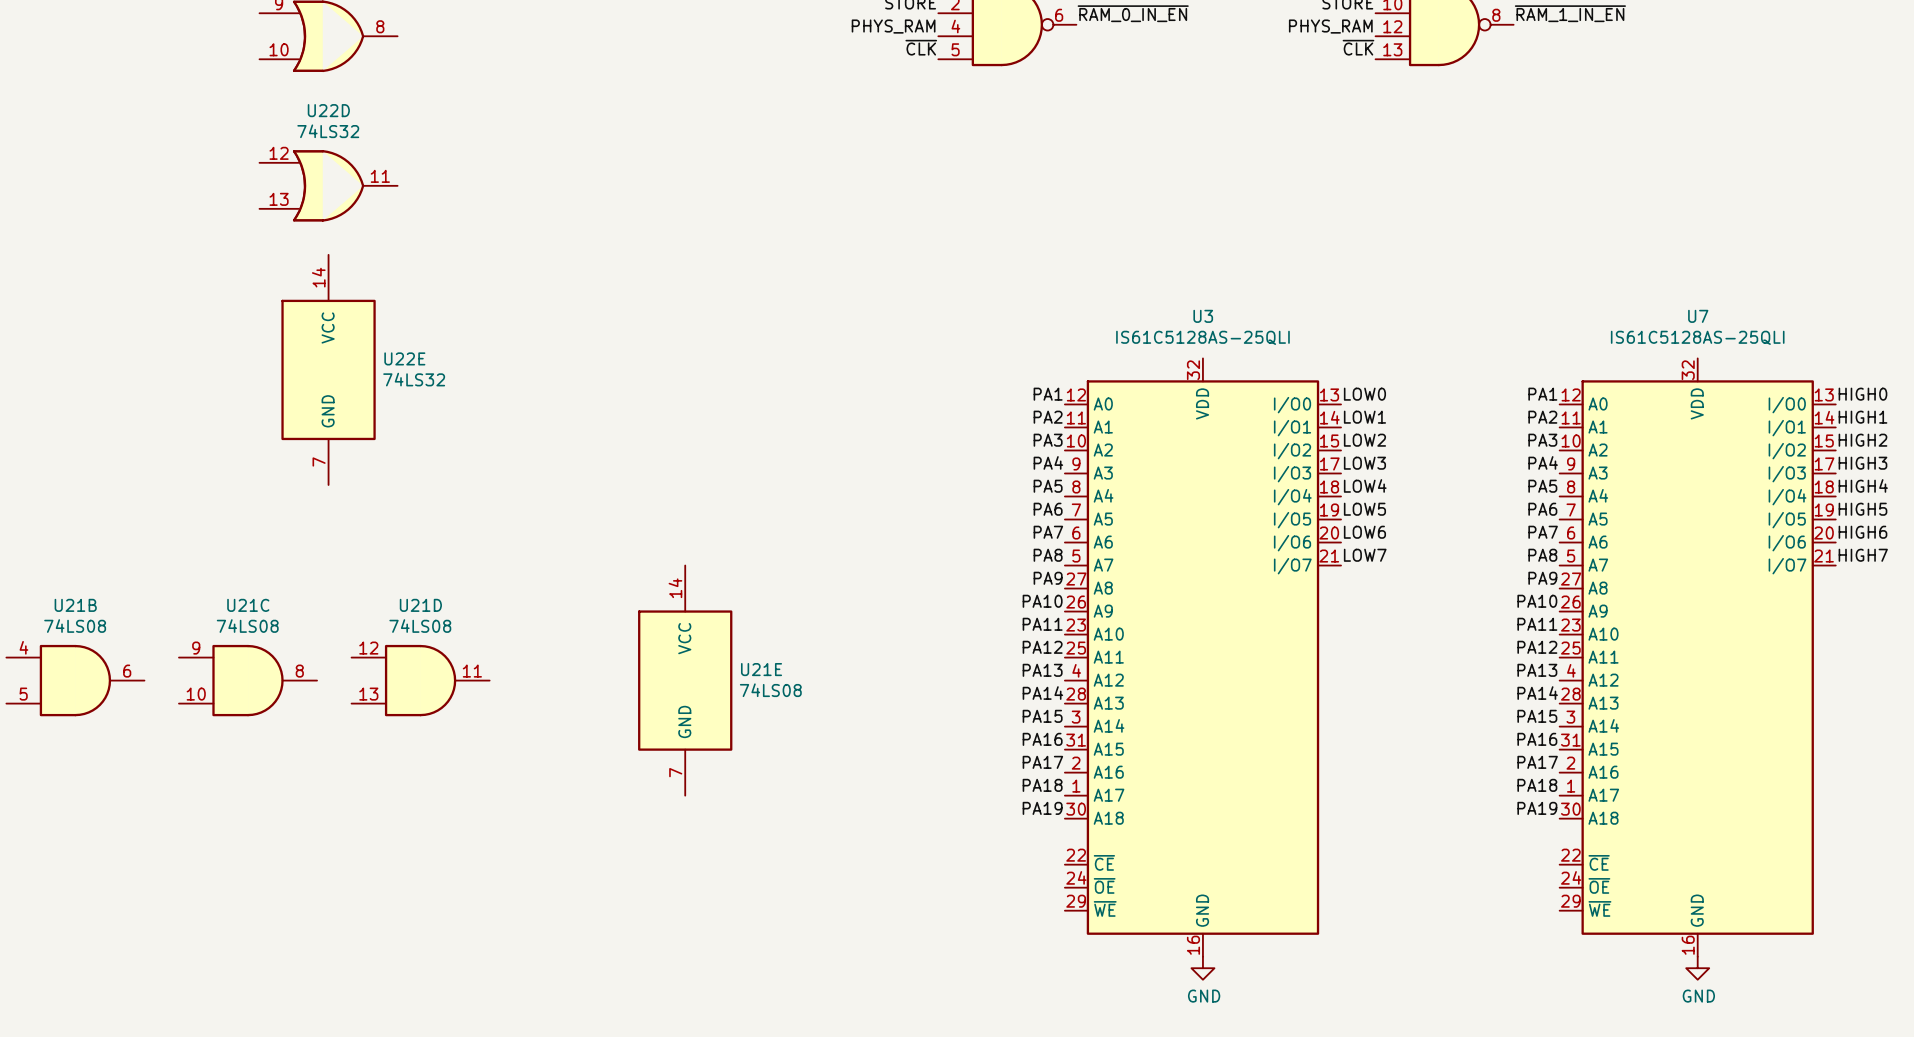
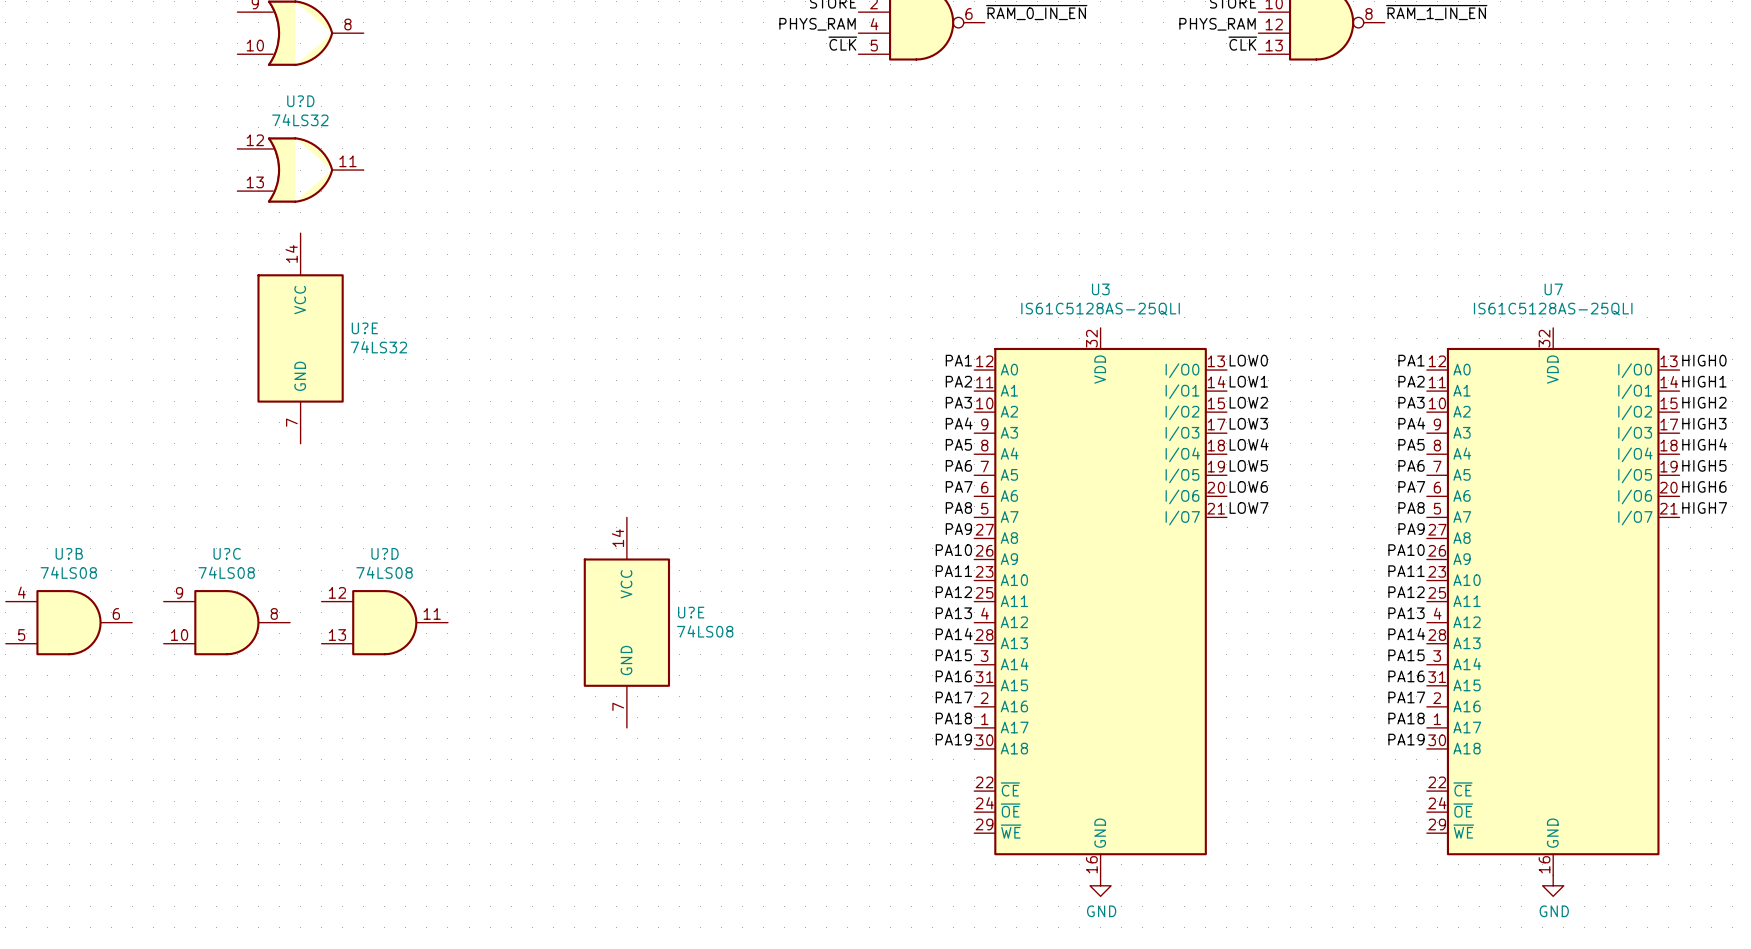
U22D name: U22D (328, 110) -> U?D (300, 101)
U22E name: U22E (404, 358) -> U?E (364, 328)
U21B name: U21B (75, 605) -> U?B (69, 553)
U21C name: U21C (248, 605) -> U?C (227, 553)
U21D name: U21D (420, 605) -> U?D (385, 553)
U21E name: U21E (761, 669) -> U?E (691, 612)

